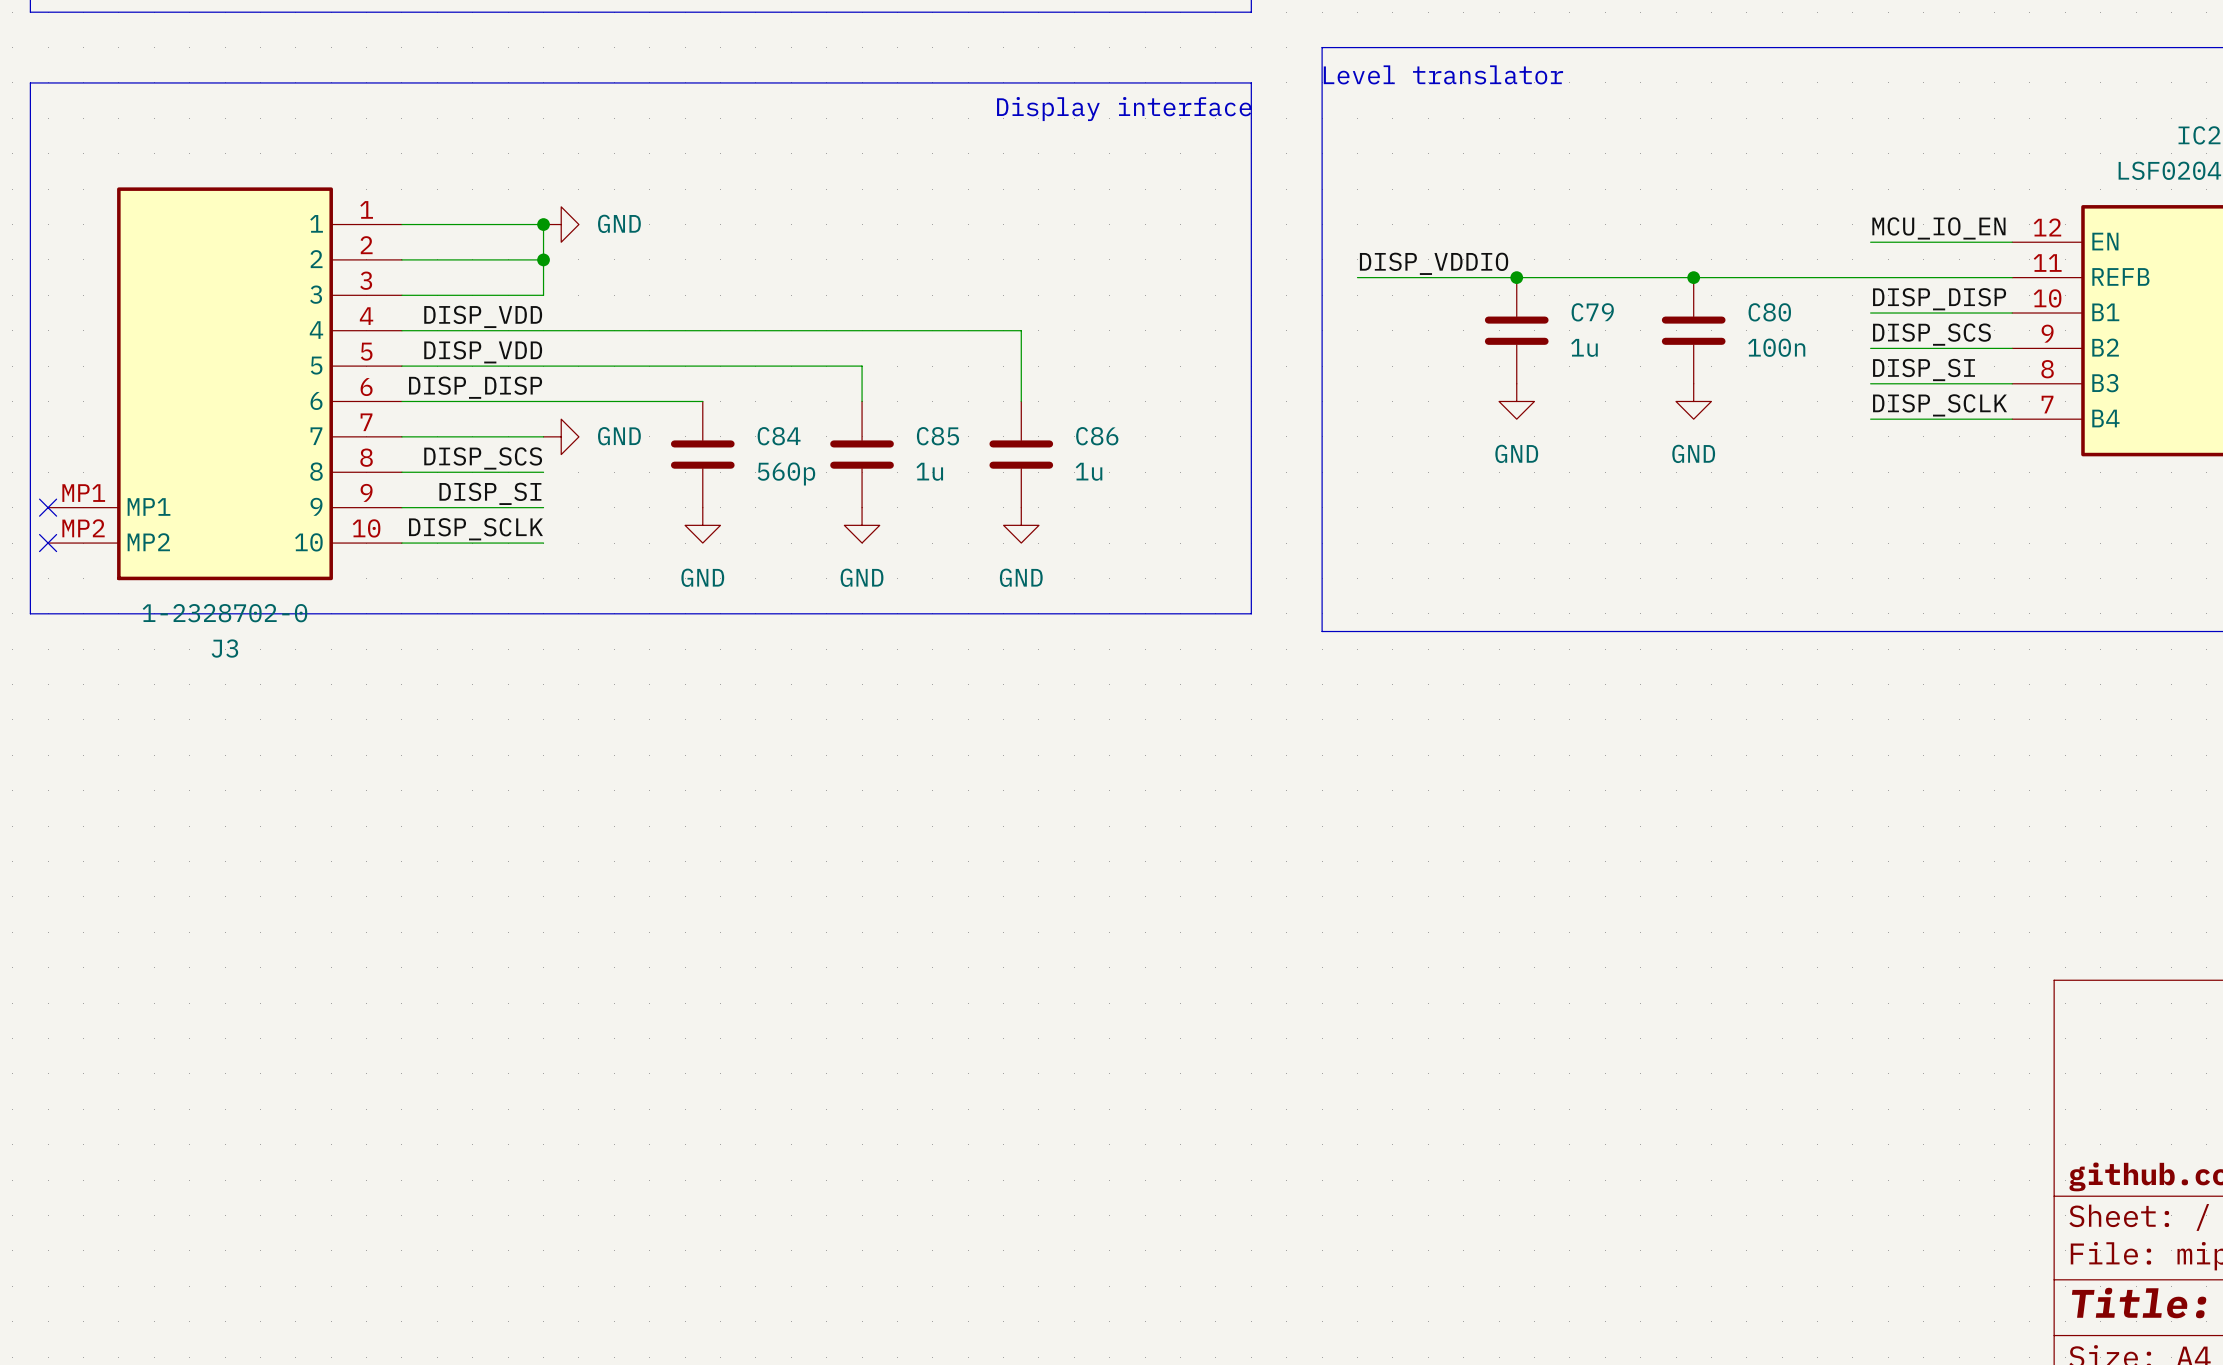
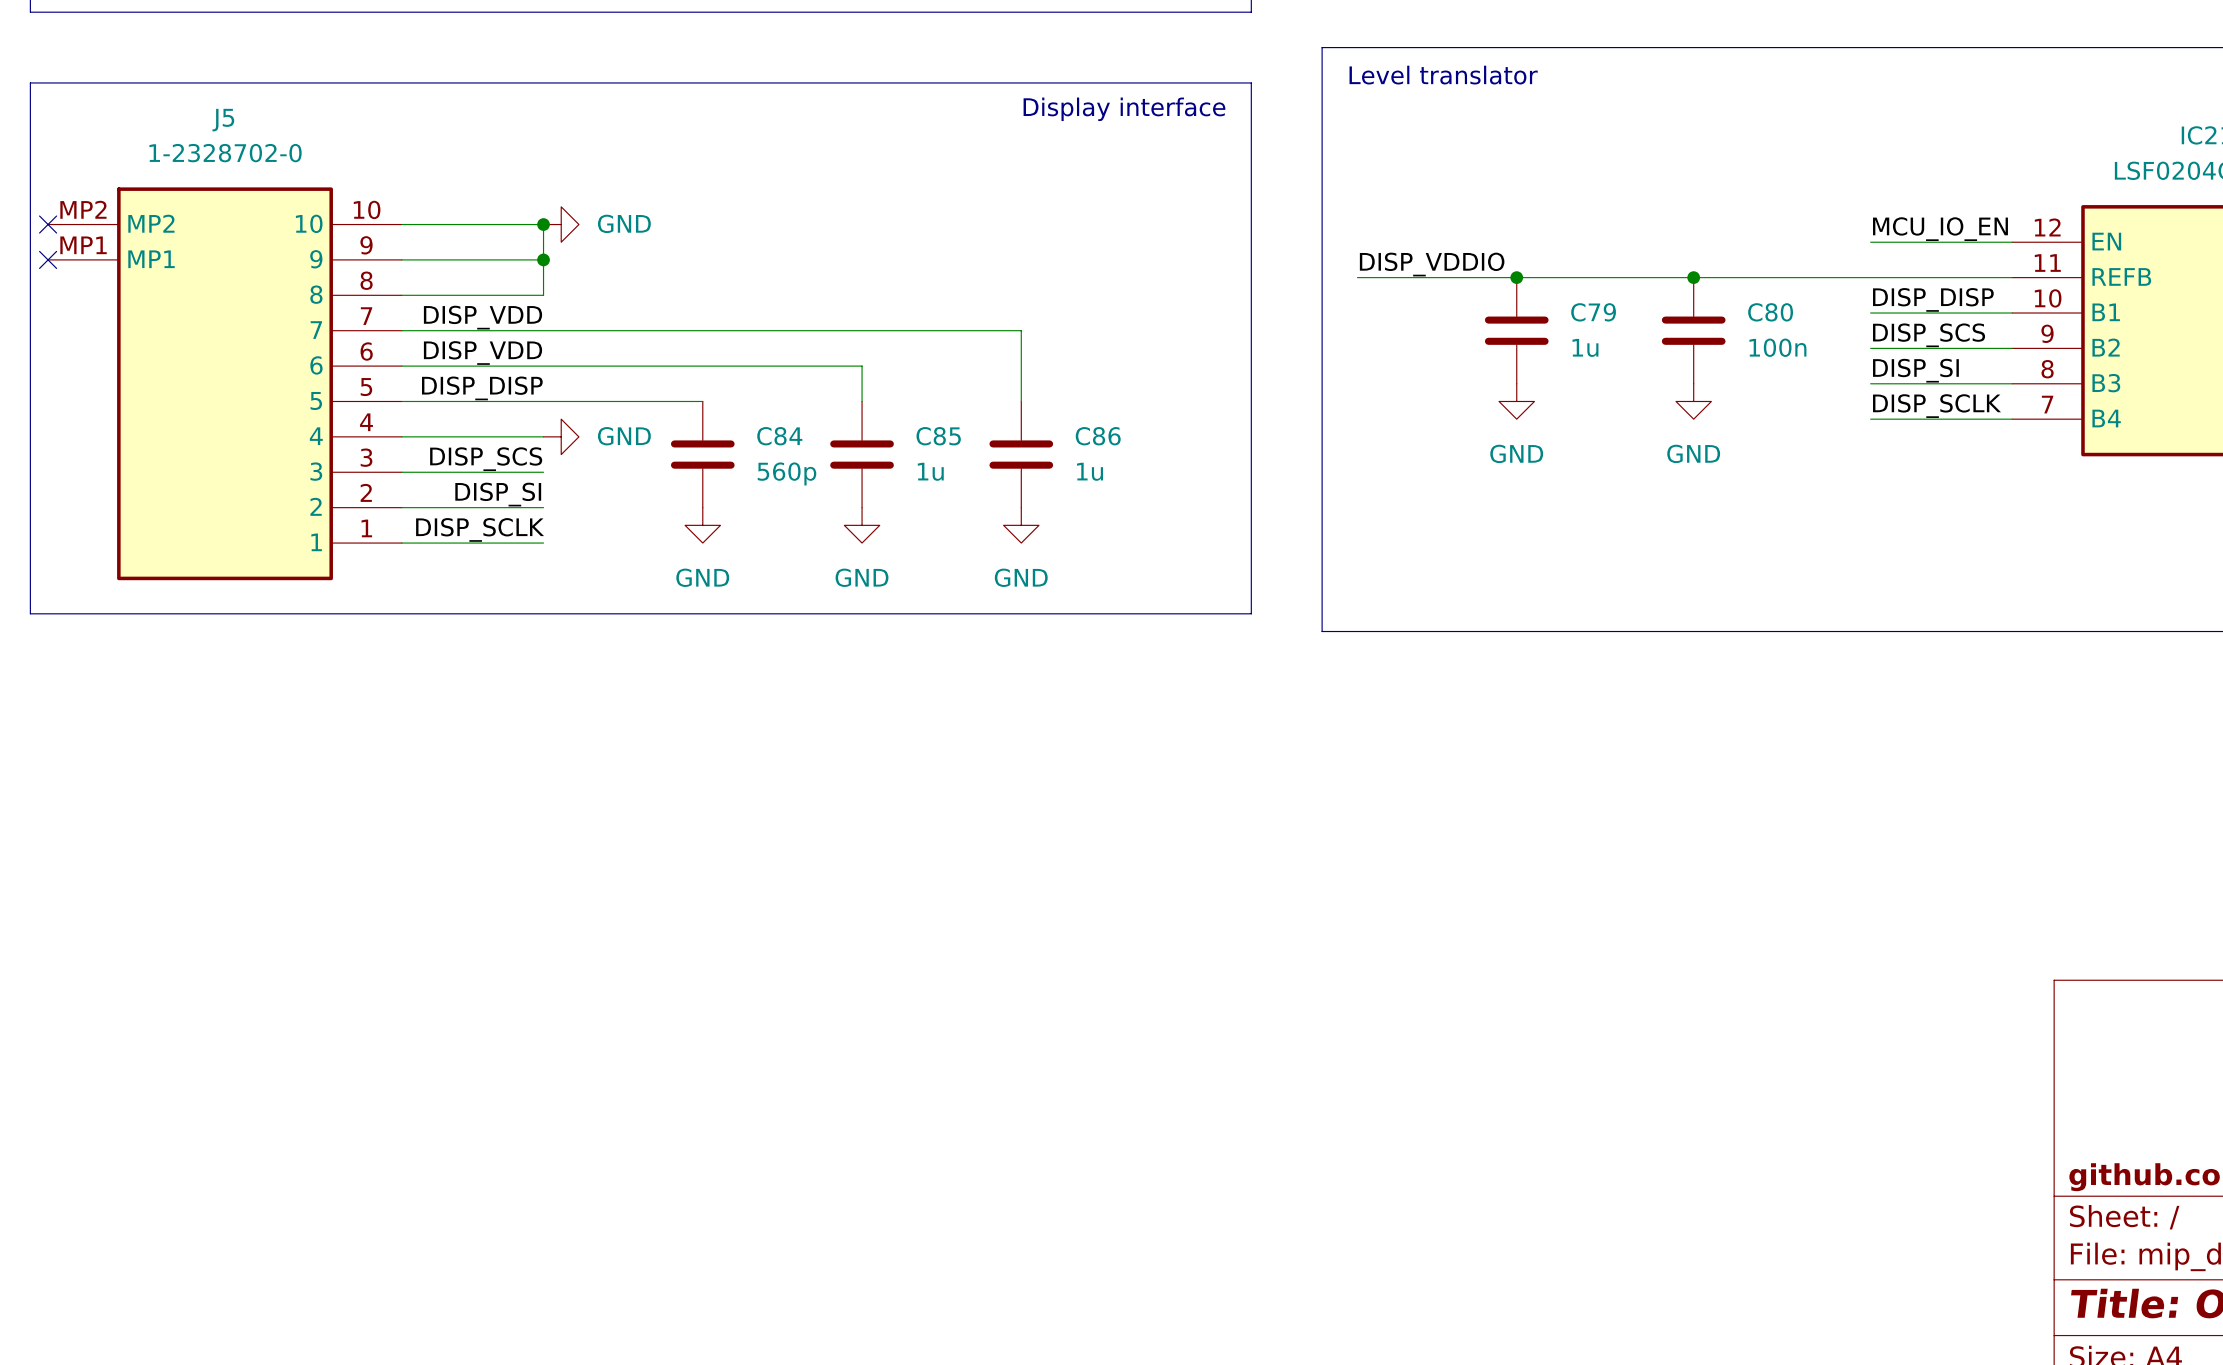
no-connect mark: none -> (48, 224)
no-connect mark: none -> (48, 259)
J3: 1-2328702-0 (225, 383) -> none
J5: none -> 1-2328702-0 (225, 383)
no-connect mark: (48, 507) -> none
no-connect mark: (48, 543) -> none

